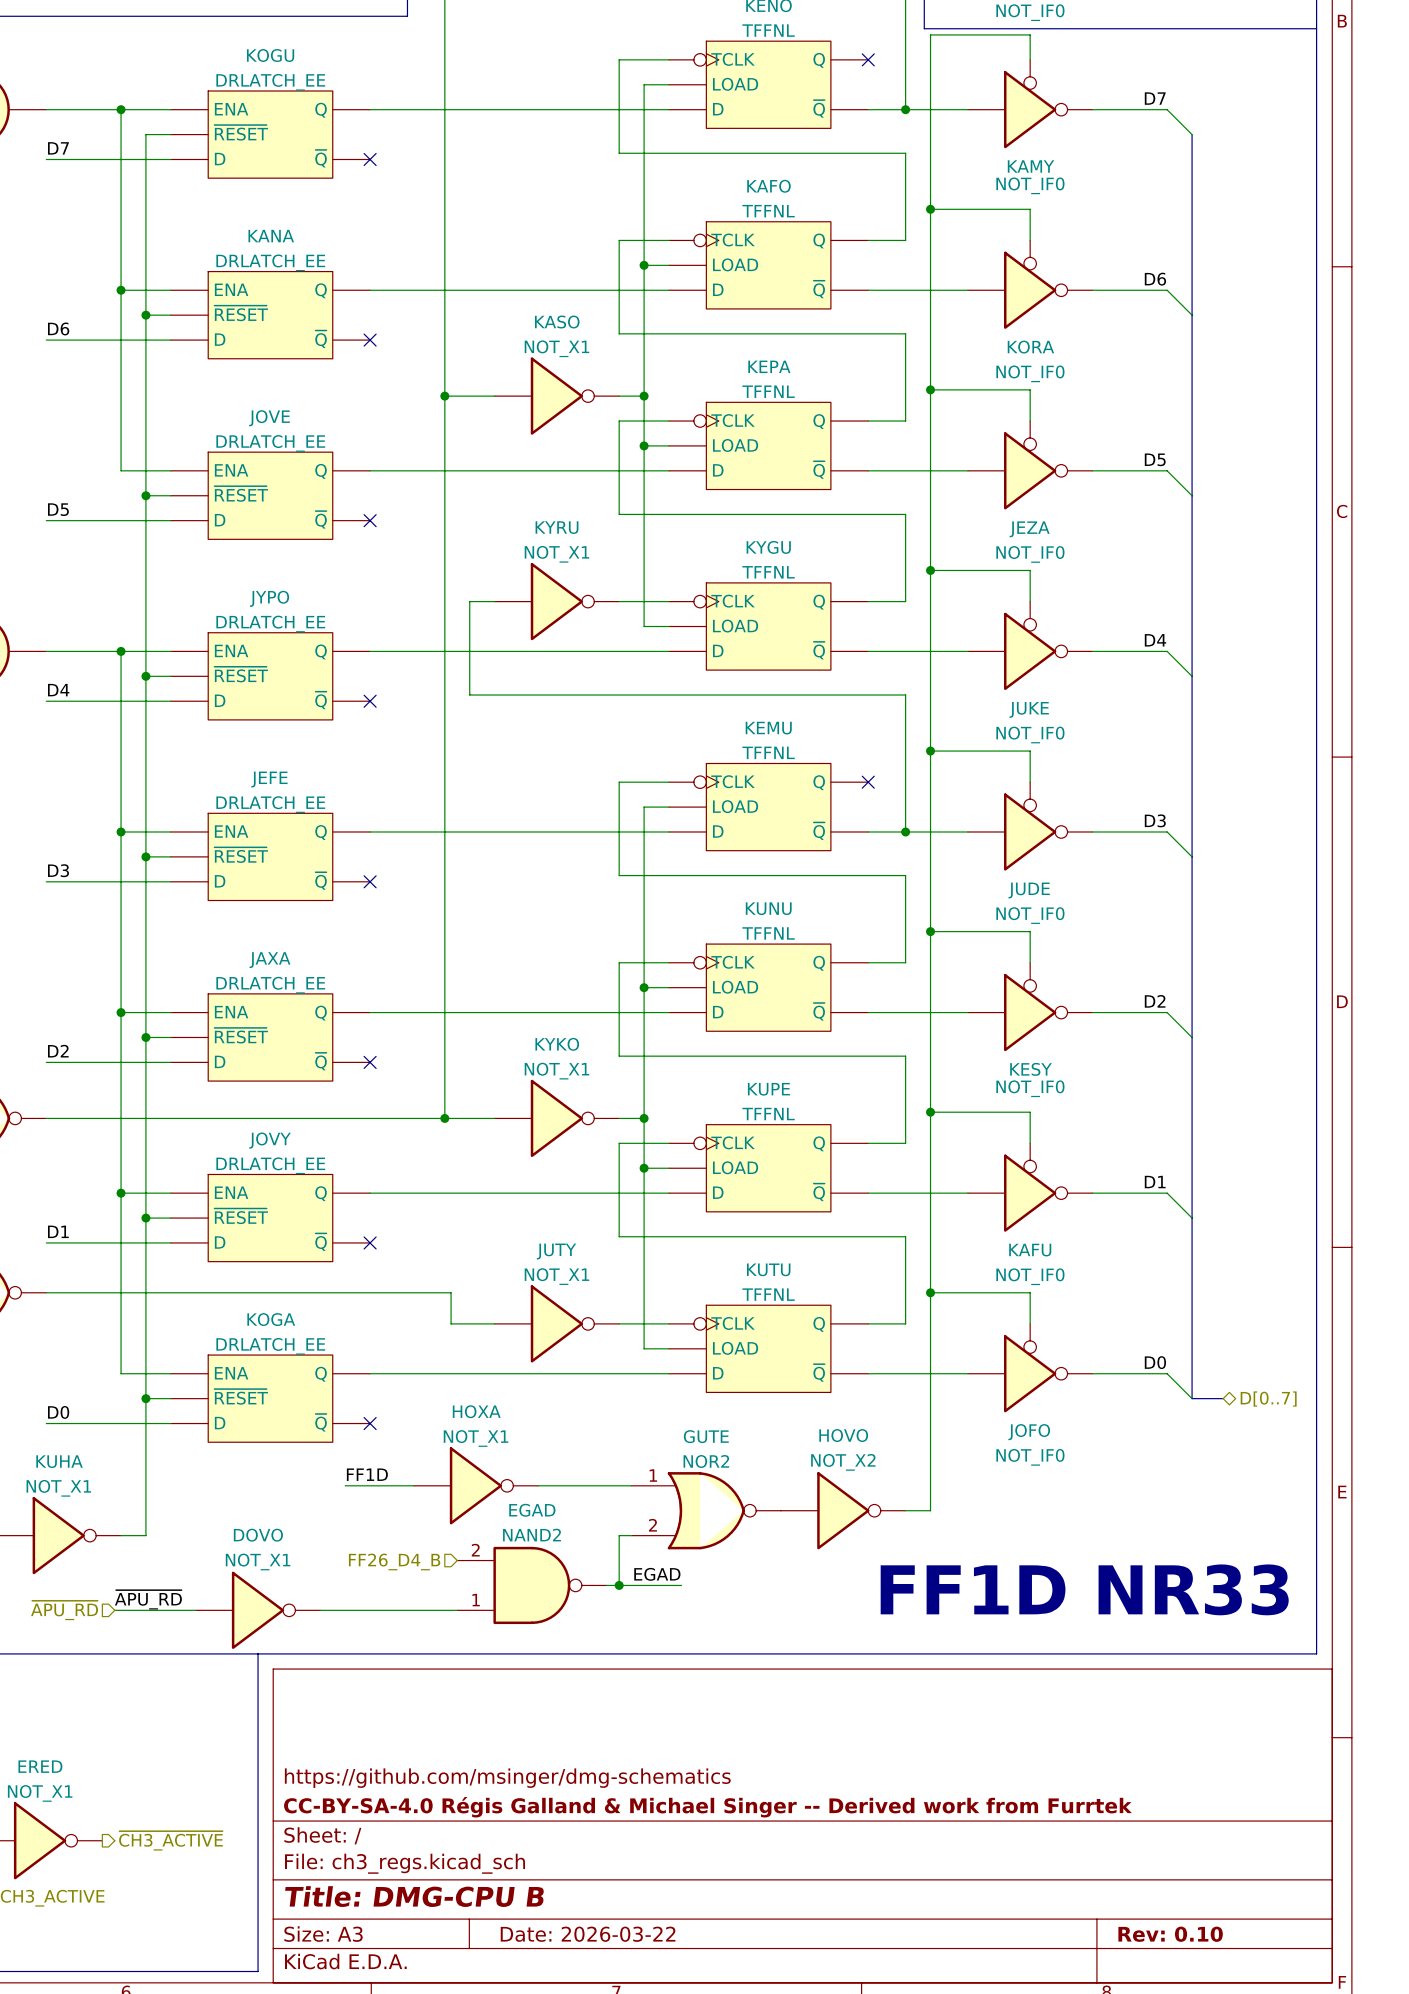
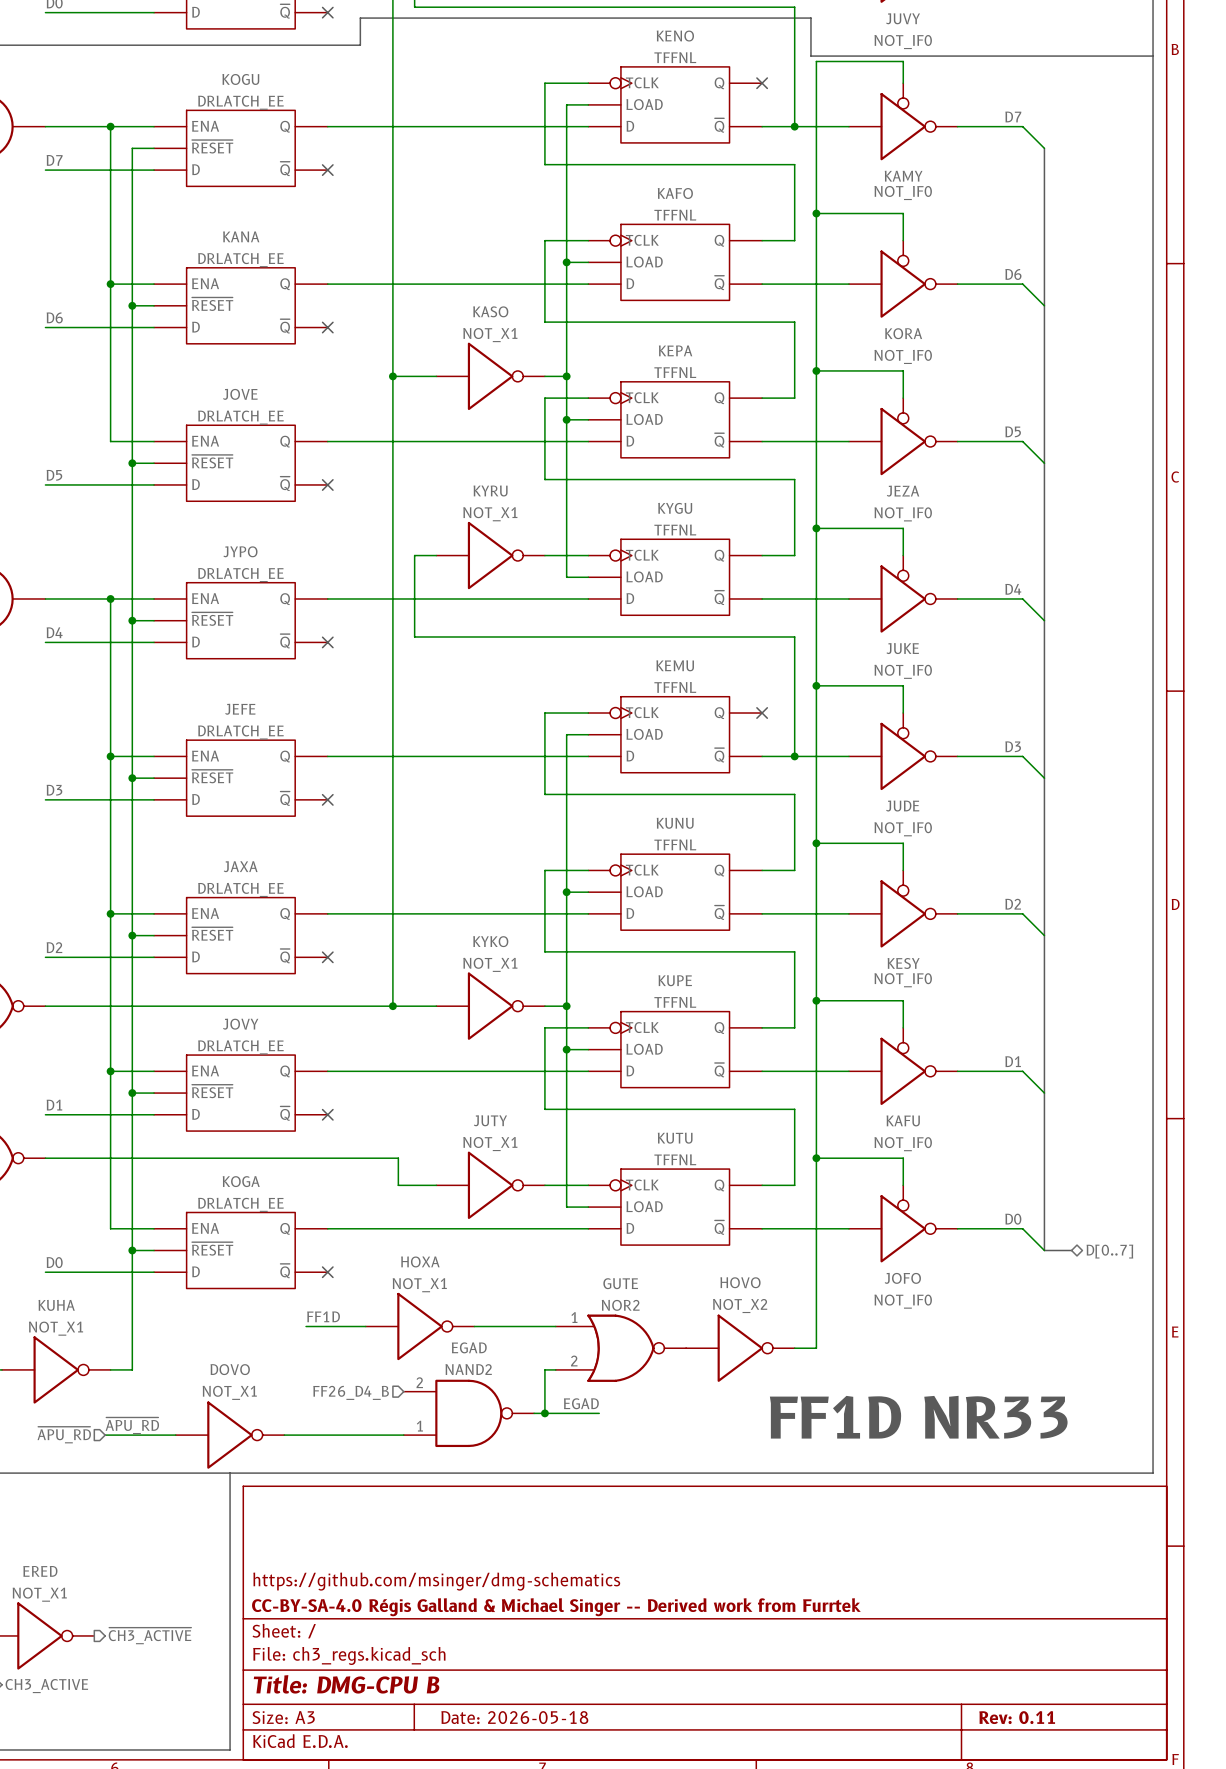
title block: Date: 2026-03-22 (588, 1934) -> Date: 2026-05-18 (514, 1717)
title block: Rev: 0.10 (1170, 1934) -> Rev: 0.11 (1017, 1717)

